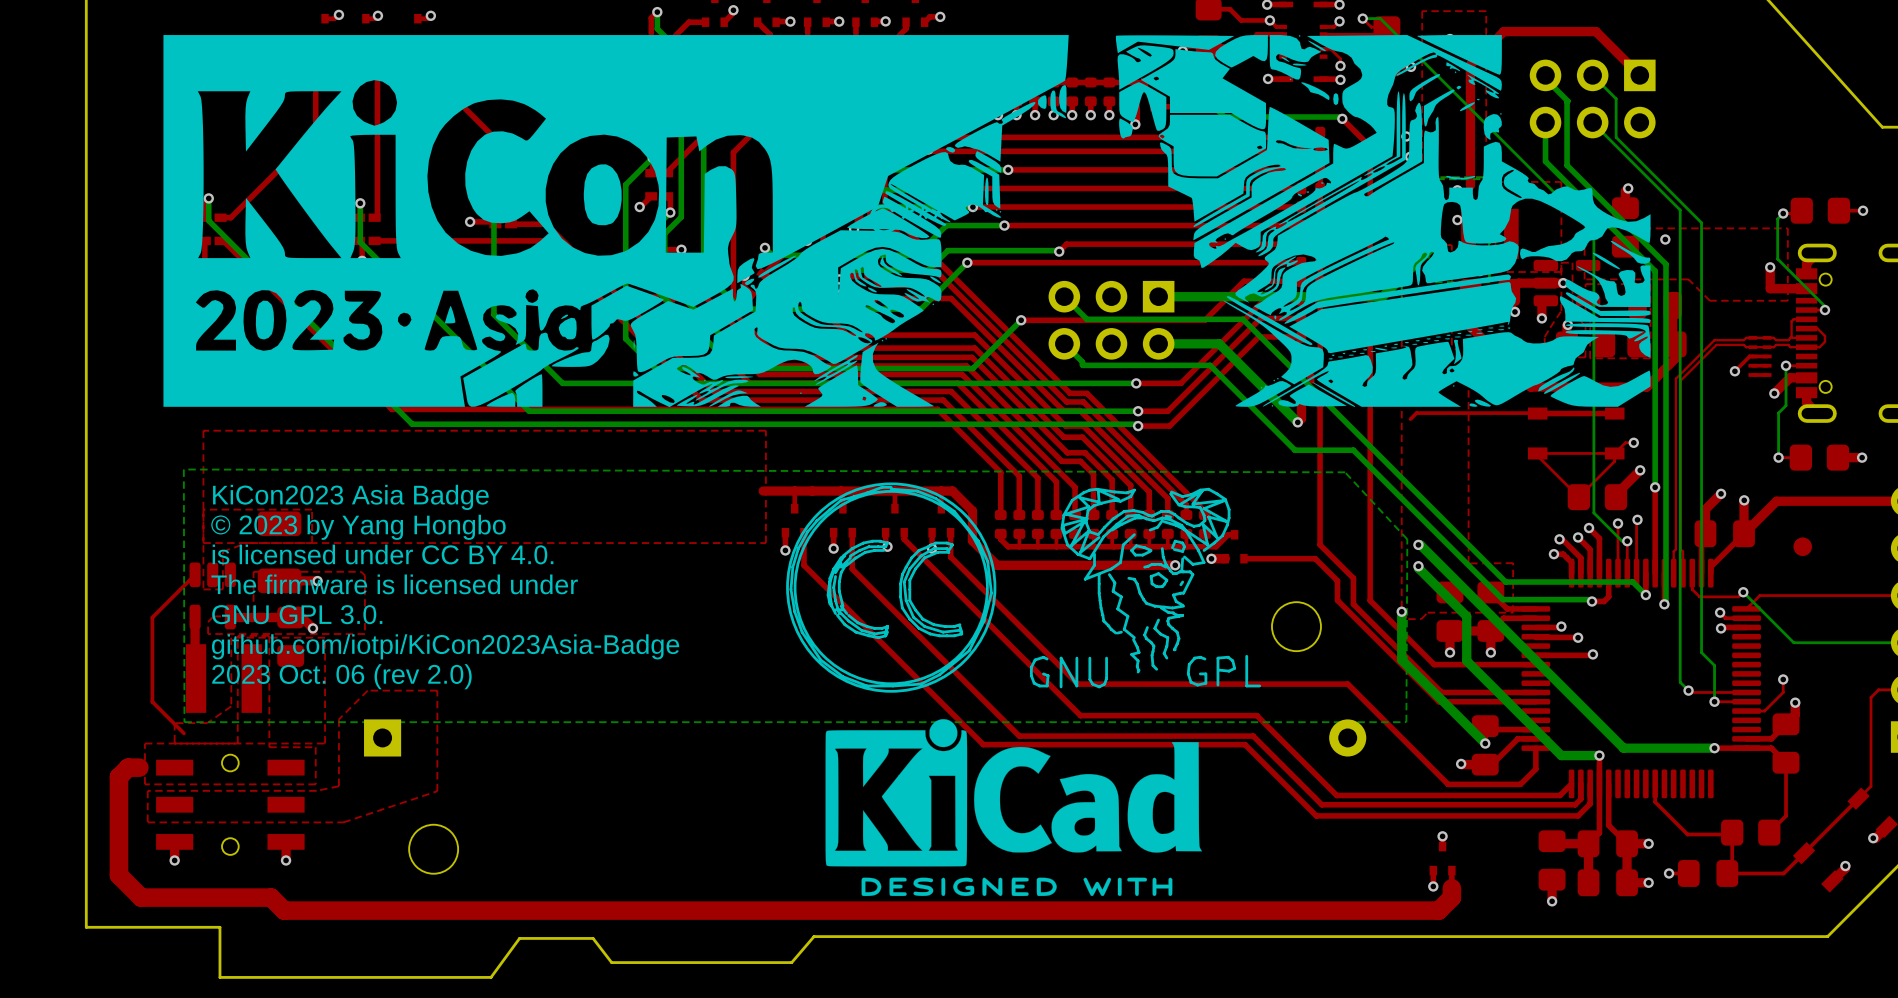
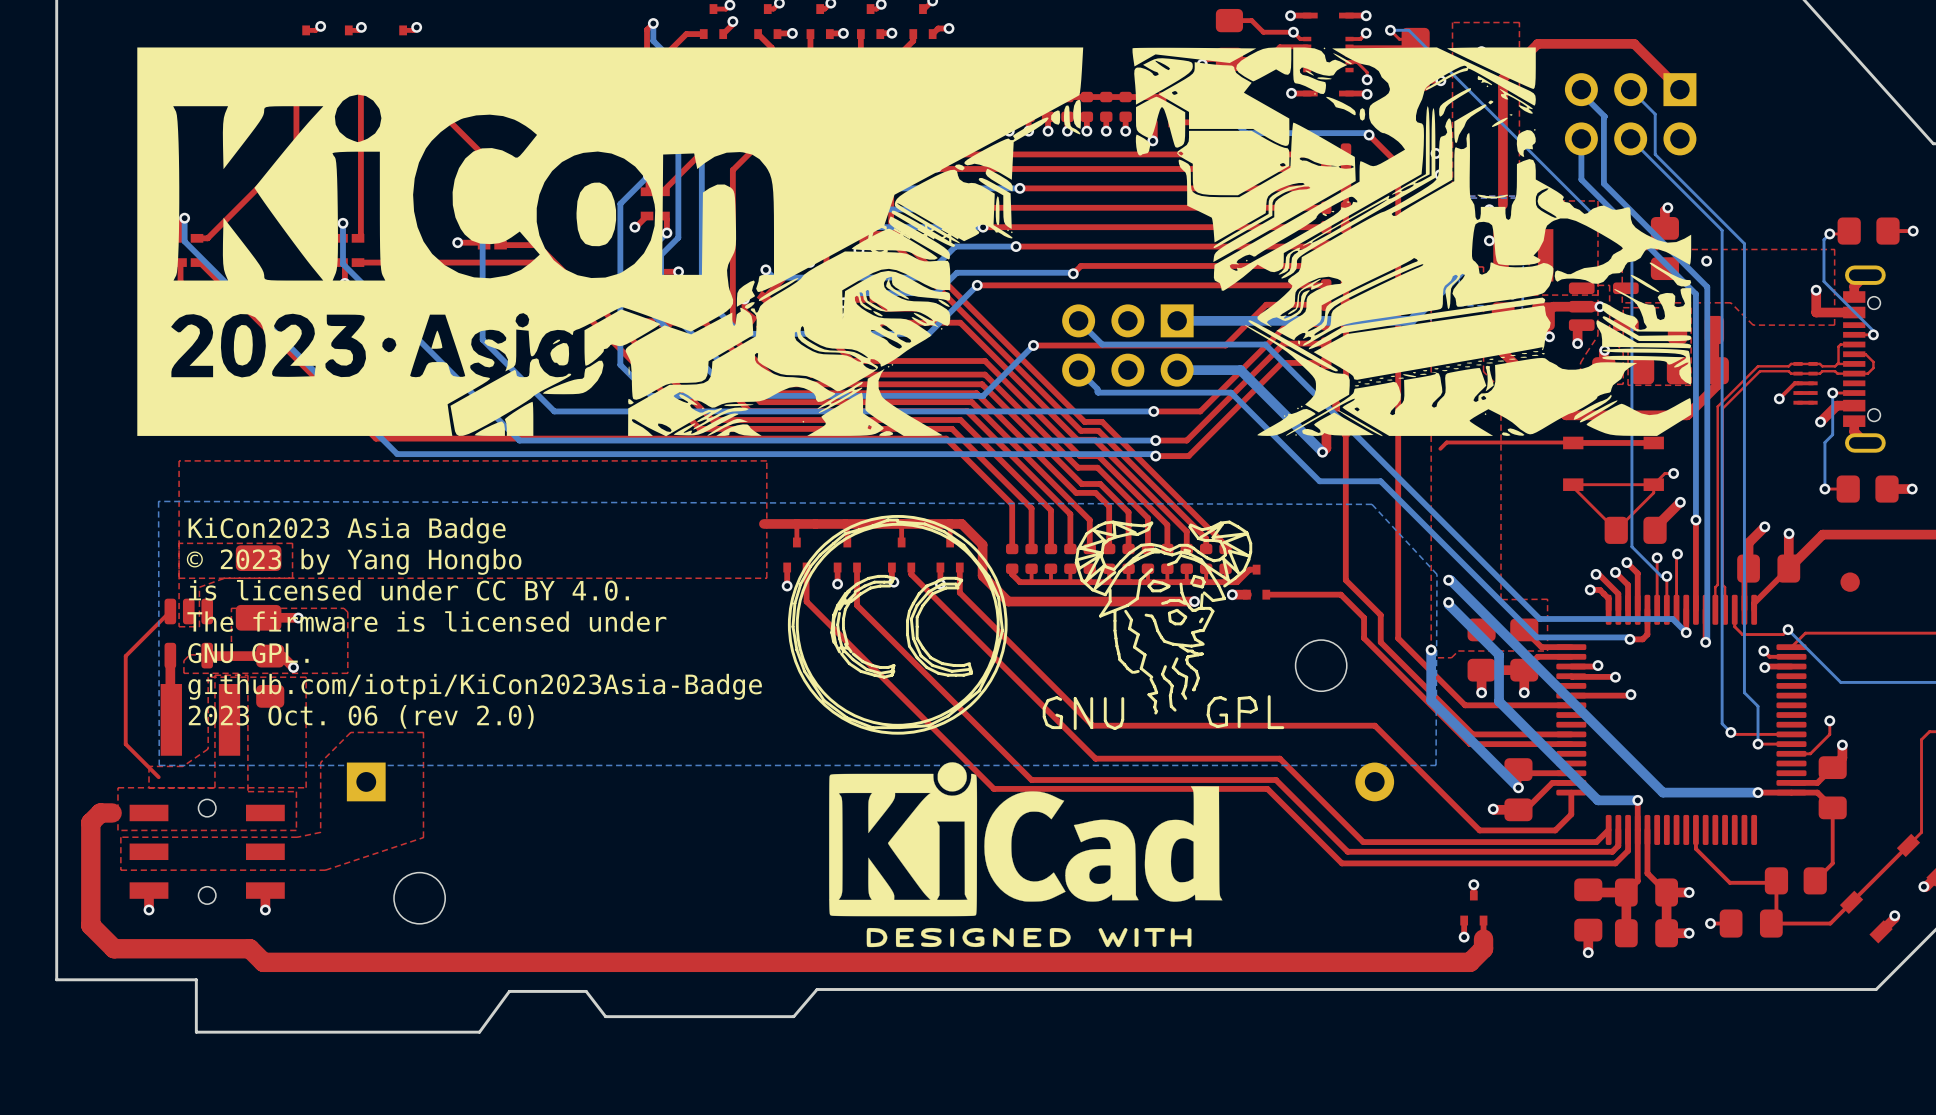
text: GNU GPL 3.0. (297, 614) -> GNU GPL. (248, 653)

